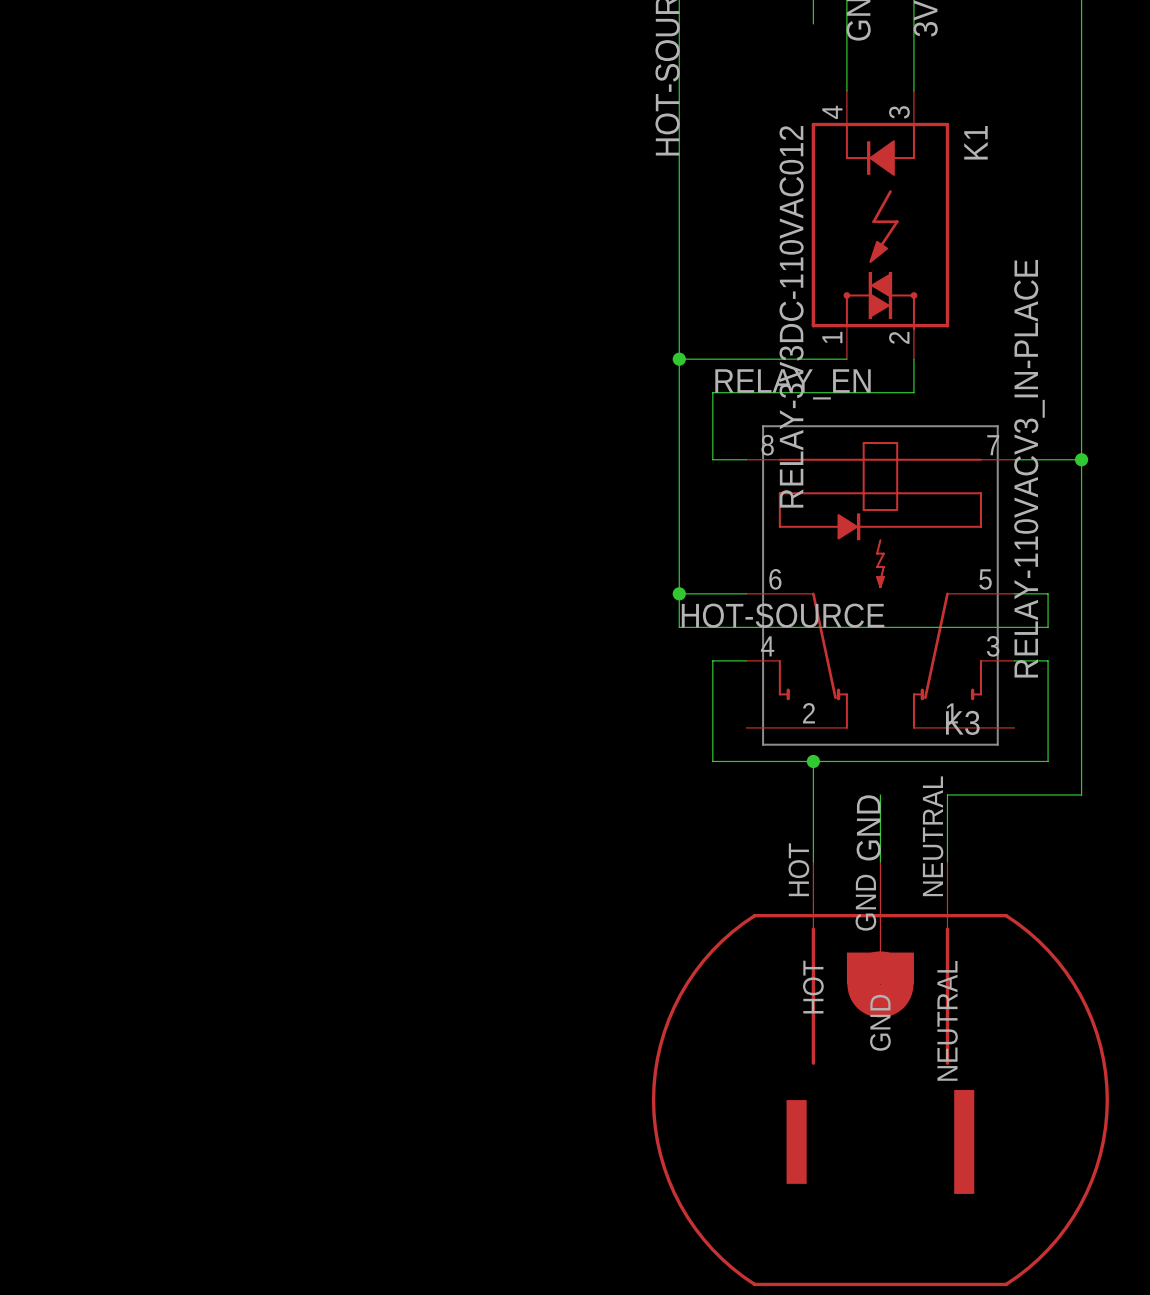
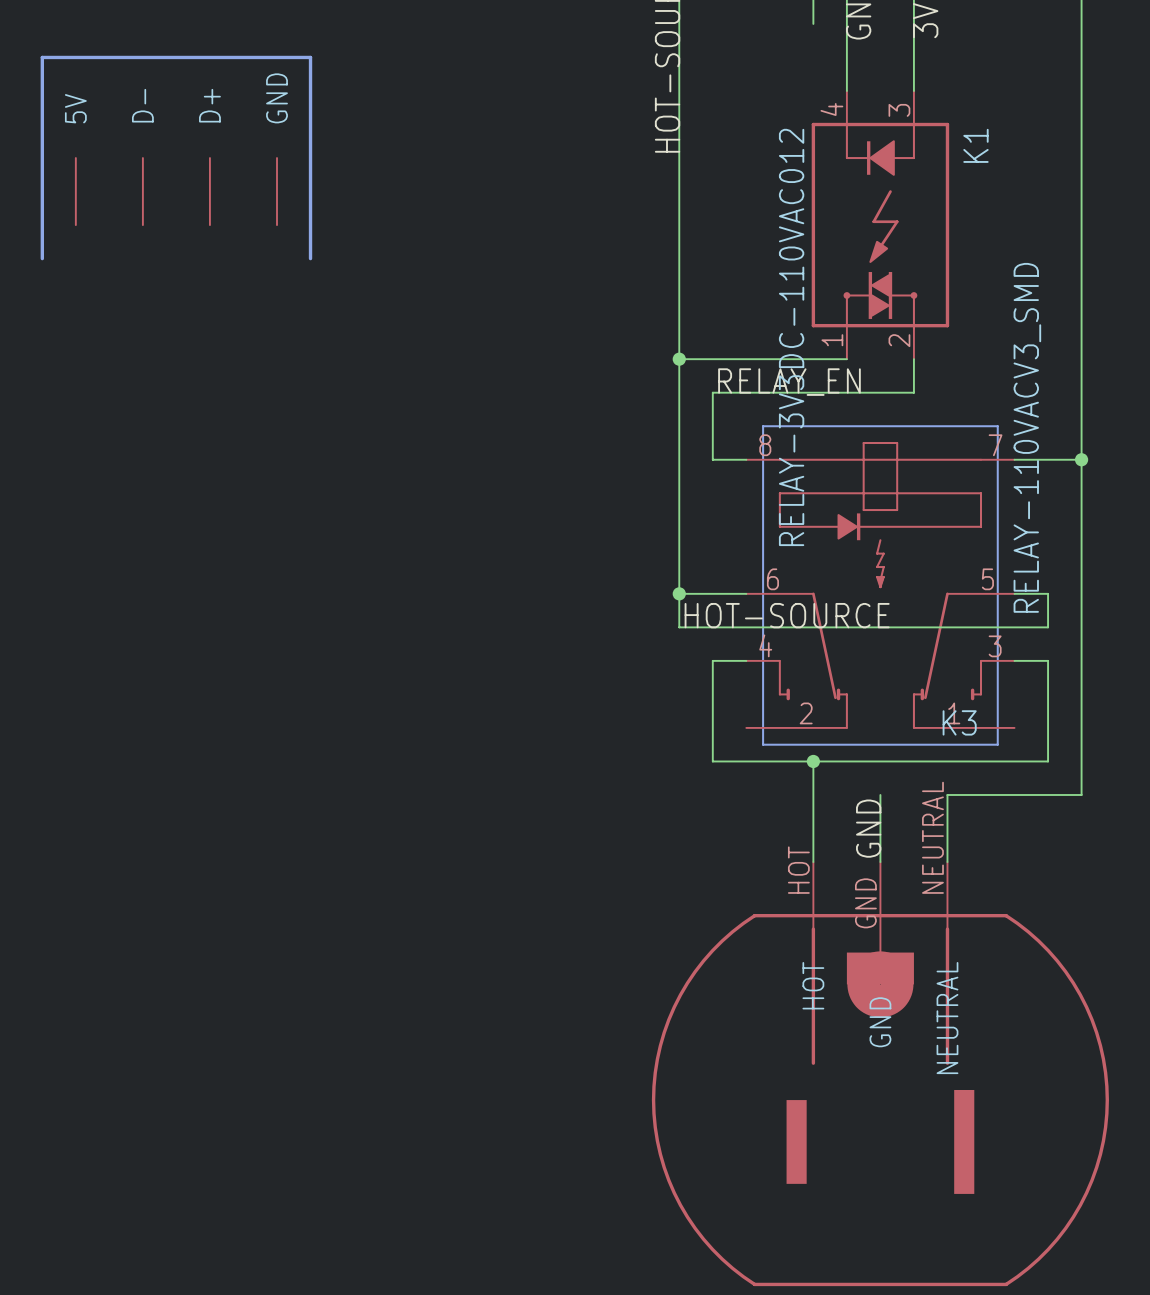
part: none -> (176, 158)
K3 value: RELAY-110VACV3_IN-PLACE (1029, 468) -> RELAY-110VACV3_SMD (1027, 437)

